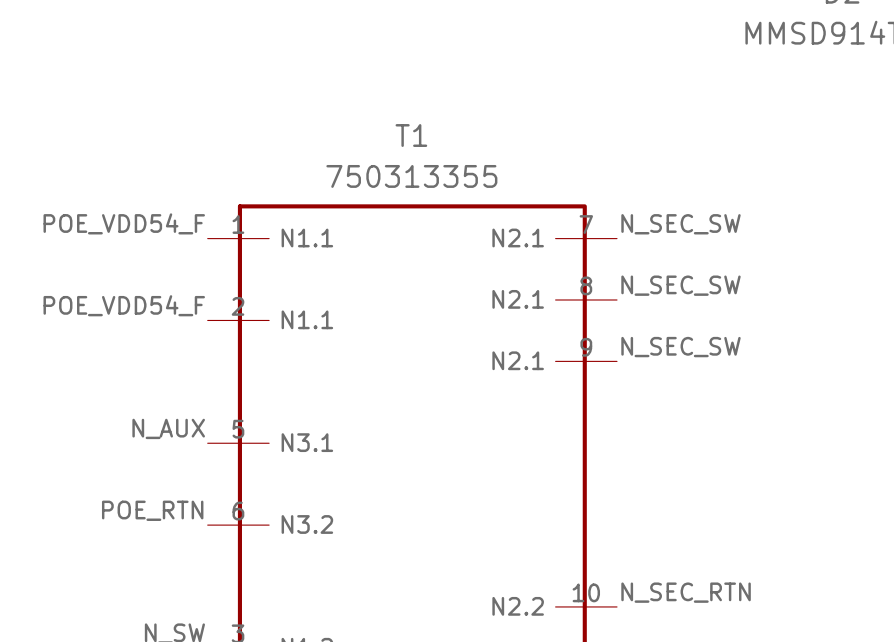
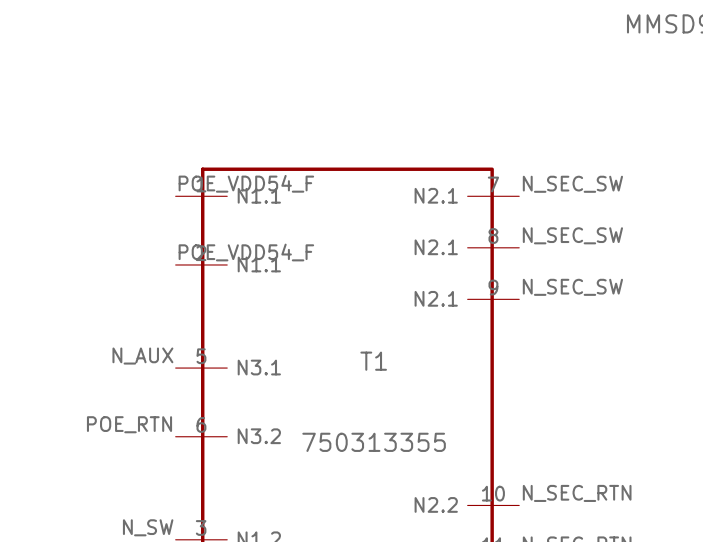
T1 name position: T1 (411, 135) -> T1 (373, 361)
T1 value position: 750313355 (411, 176) -> 750313355 (374, 442)
label position: POE_VDD54_F (124, 223) -> POE_VDD54_F (246, 183)
label position: POE_VDD54_F (124, 305) -> POE_VDD54_F (246, 252)

